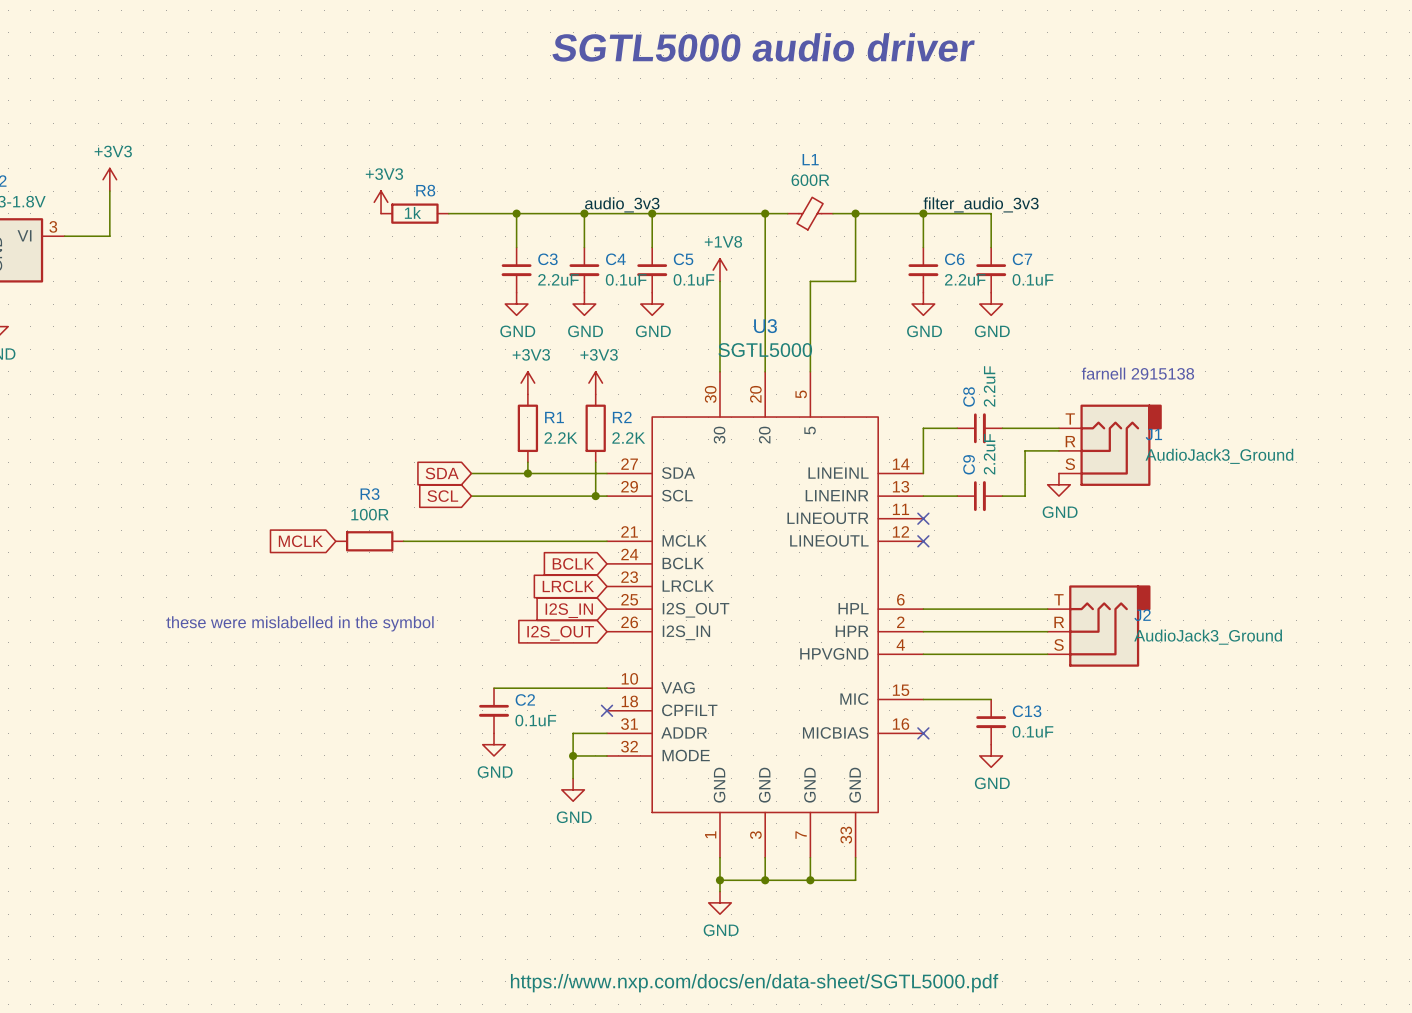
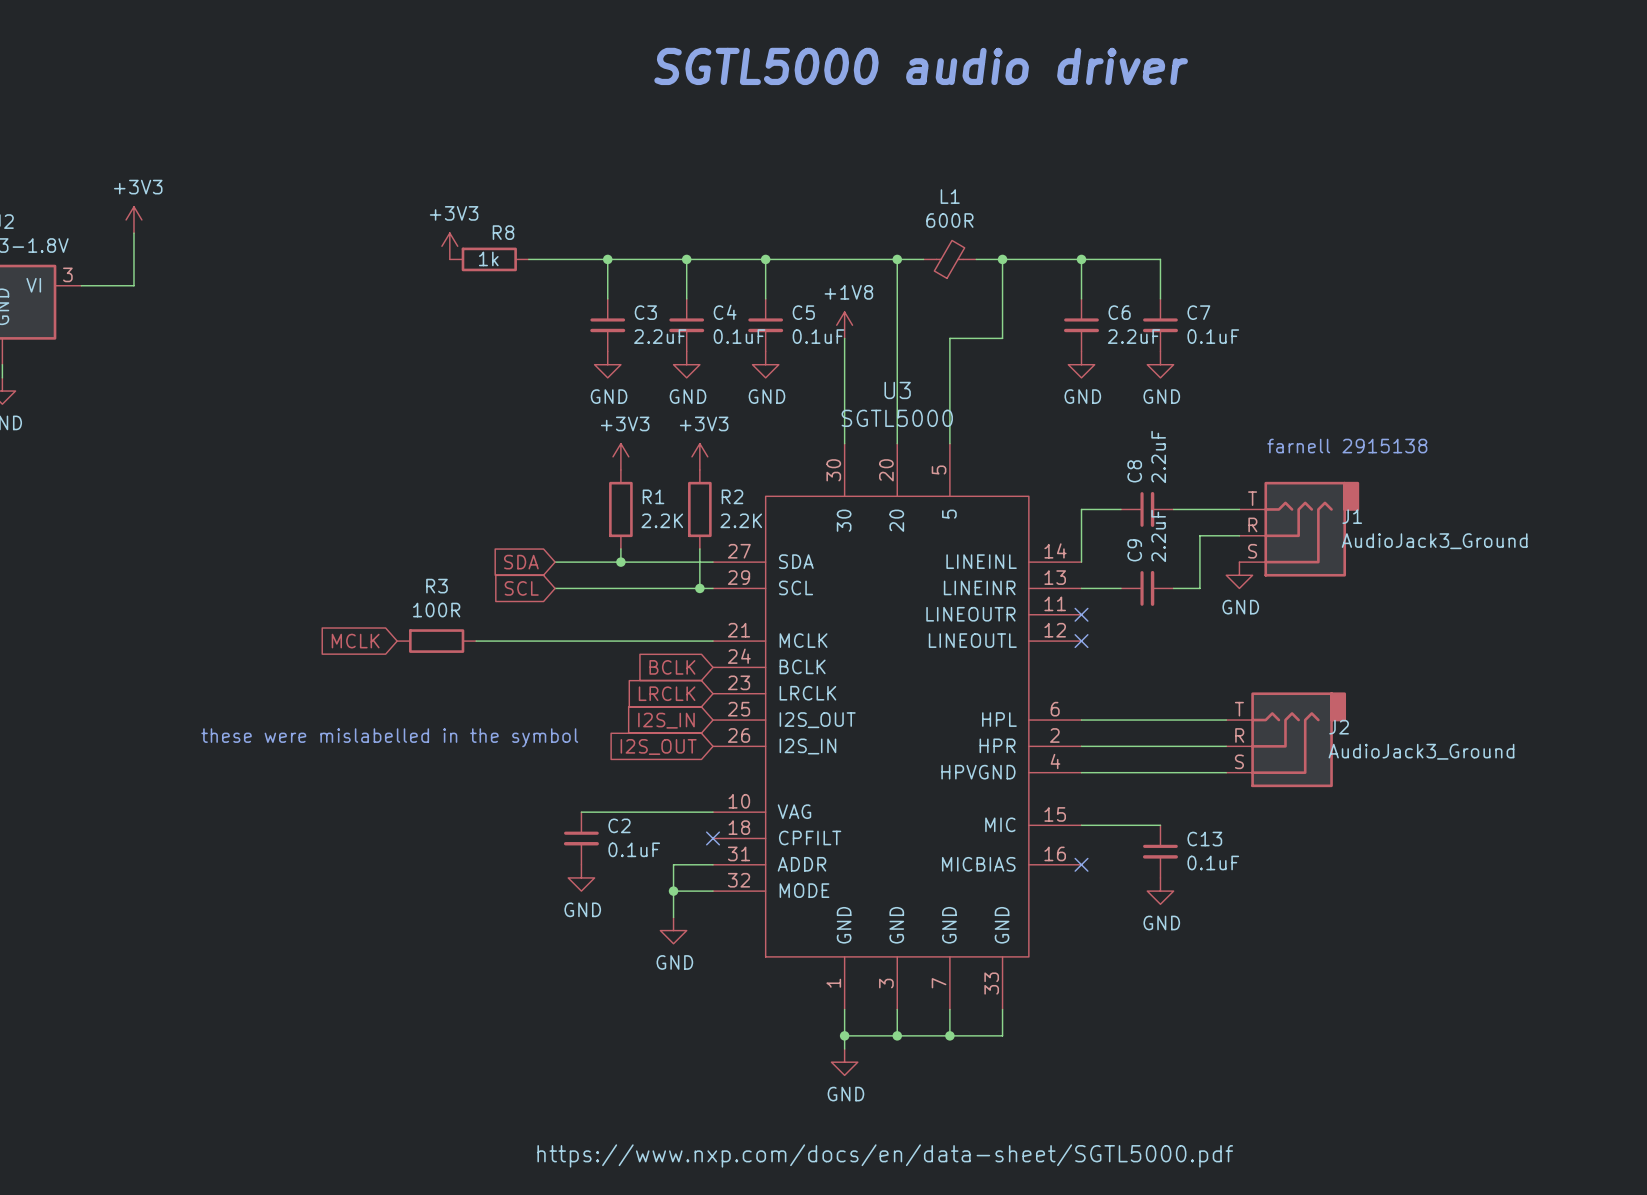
label: audio_3v3 (622, 204) -> none
label: filter_audio_3v3 (981, 204) -> none

